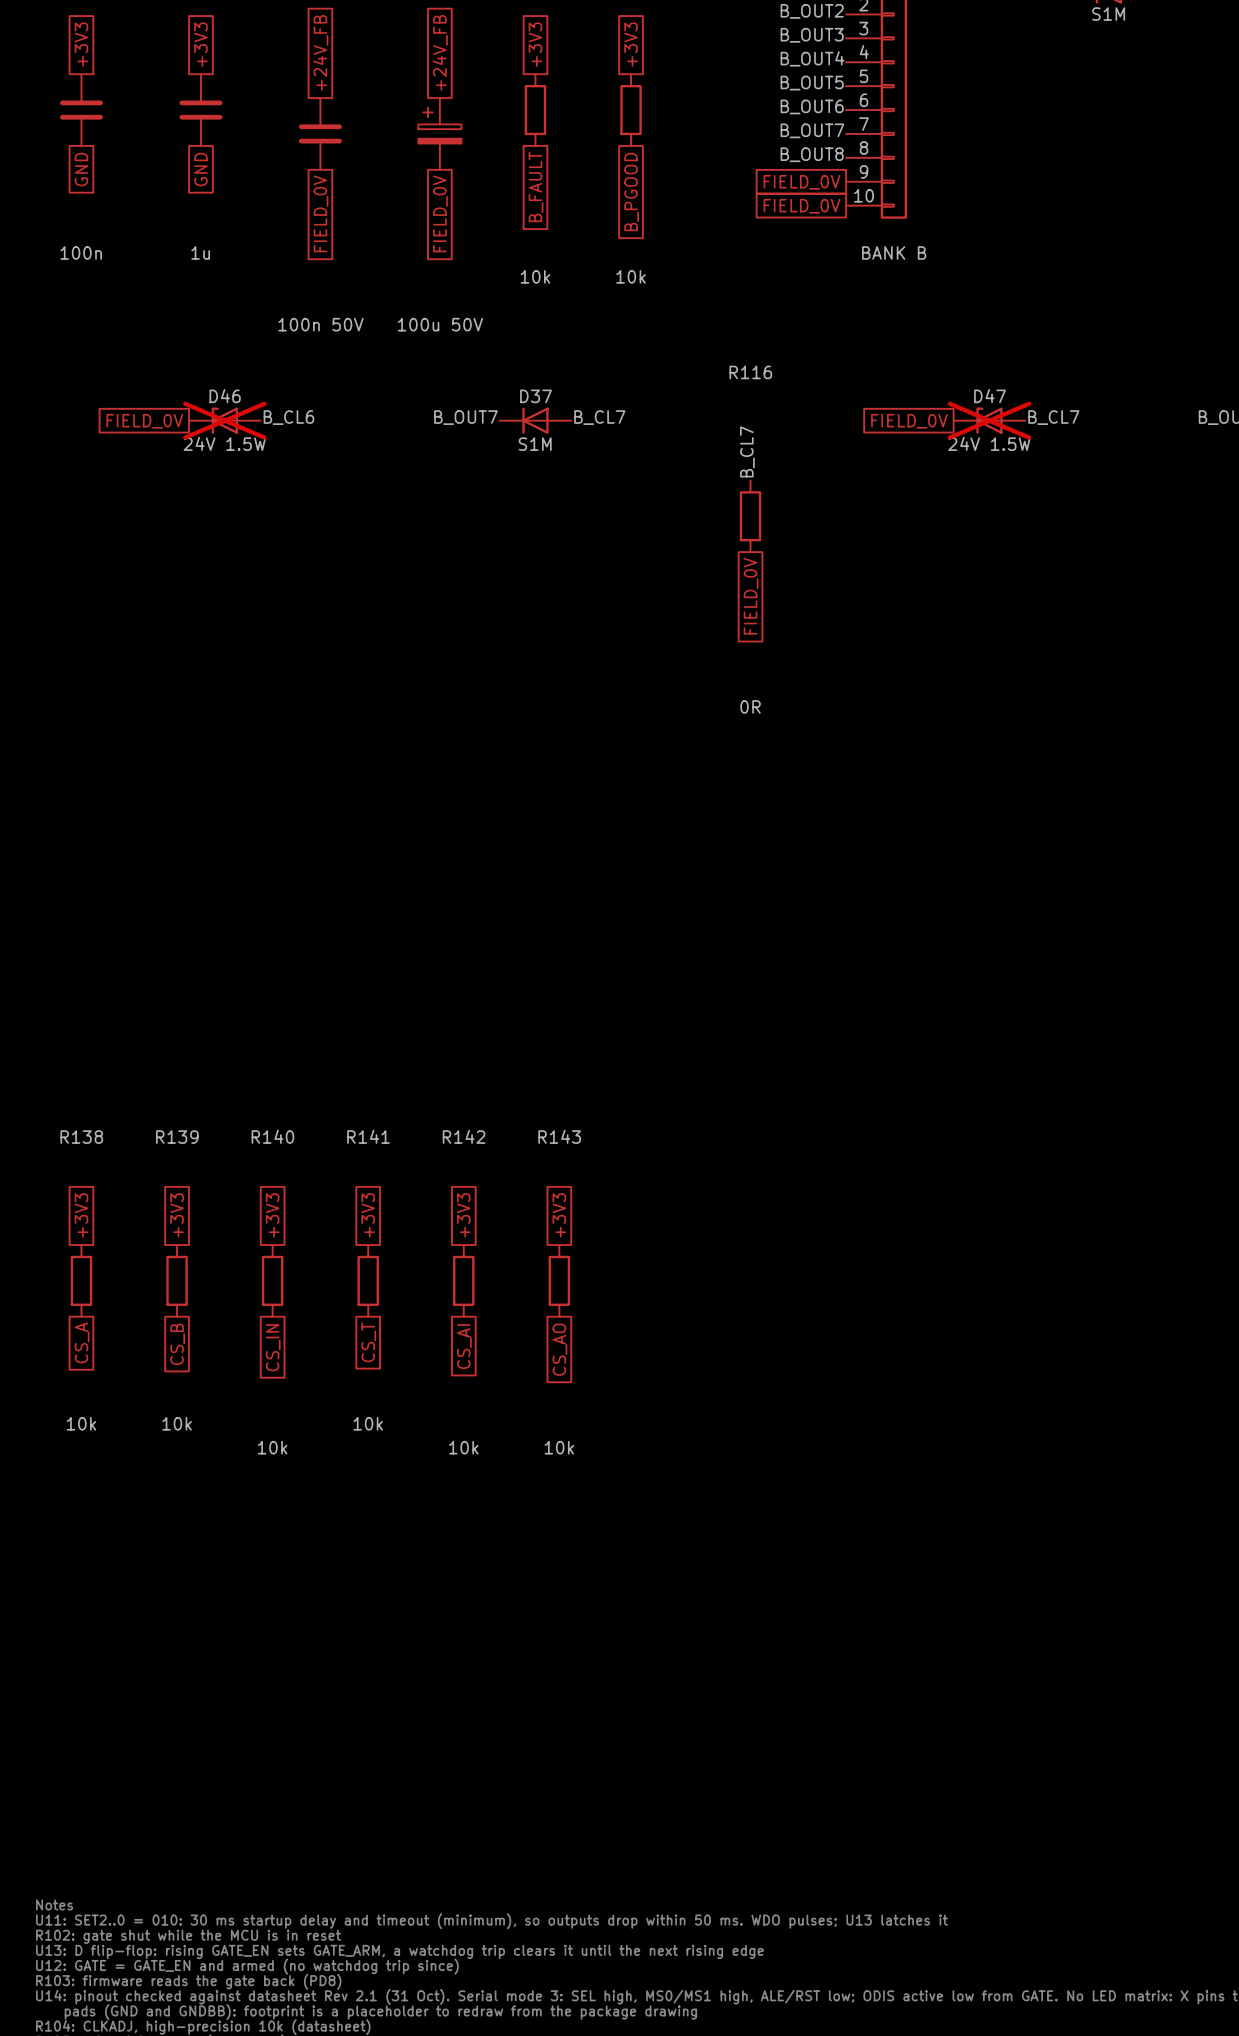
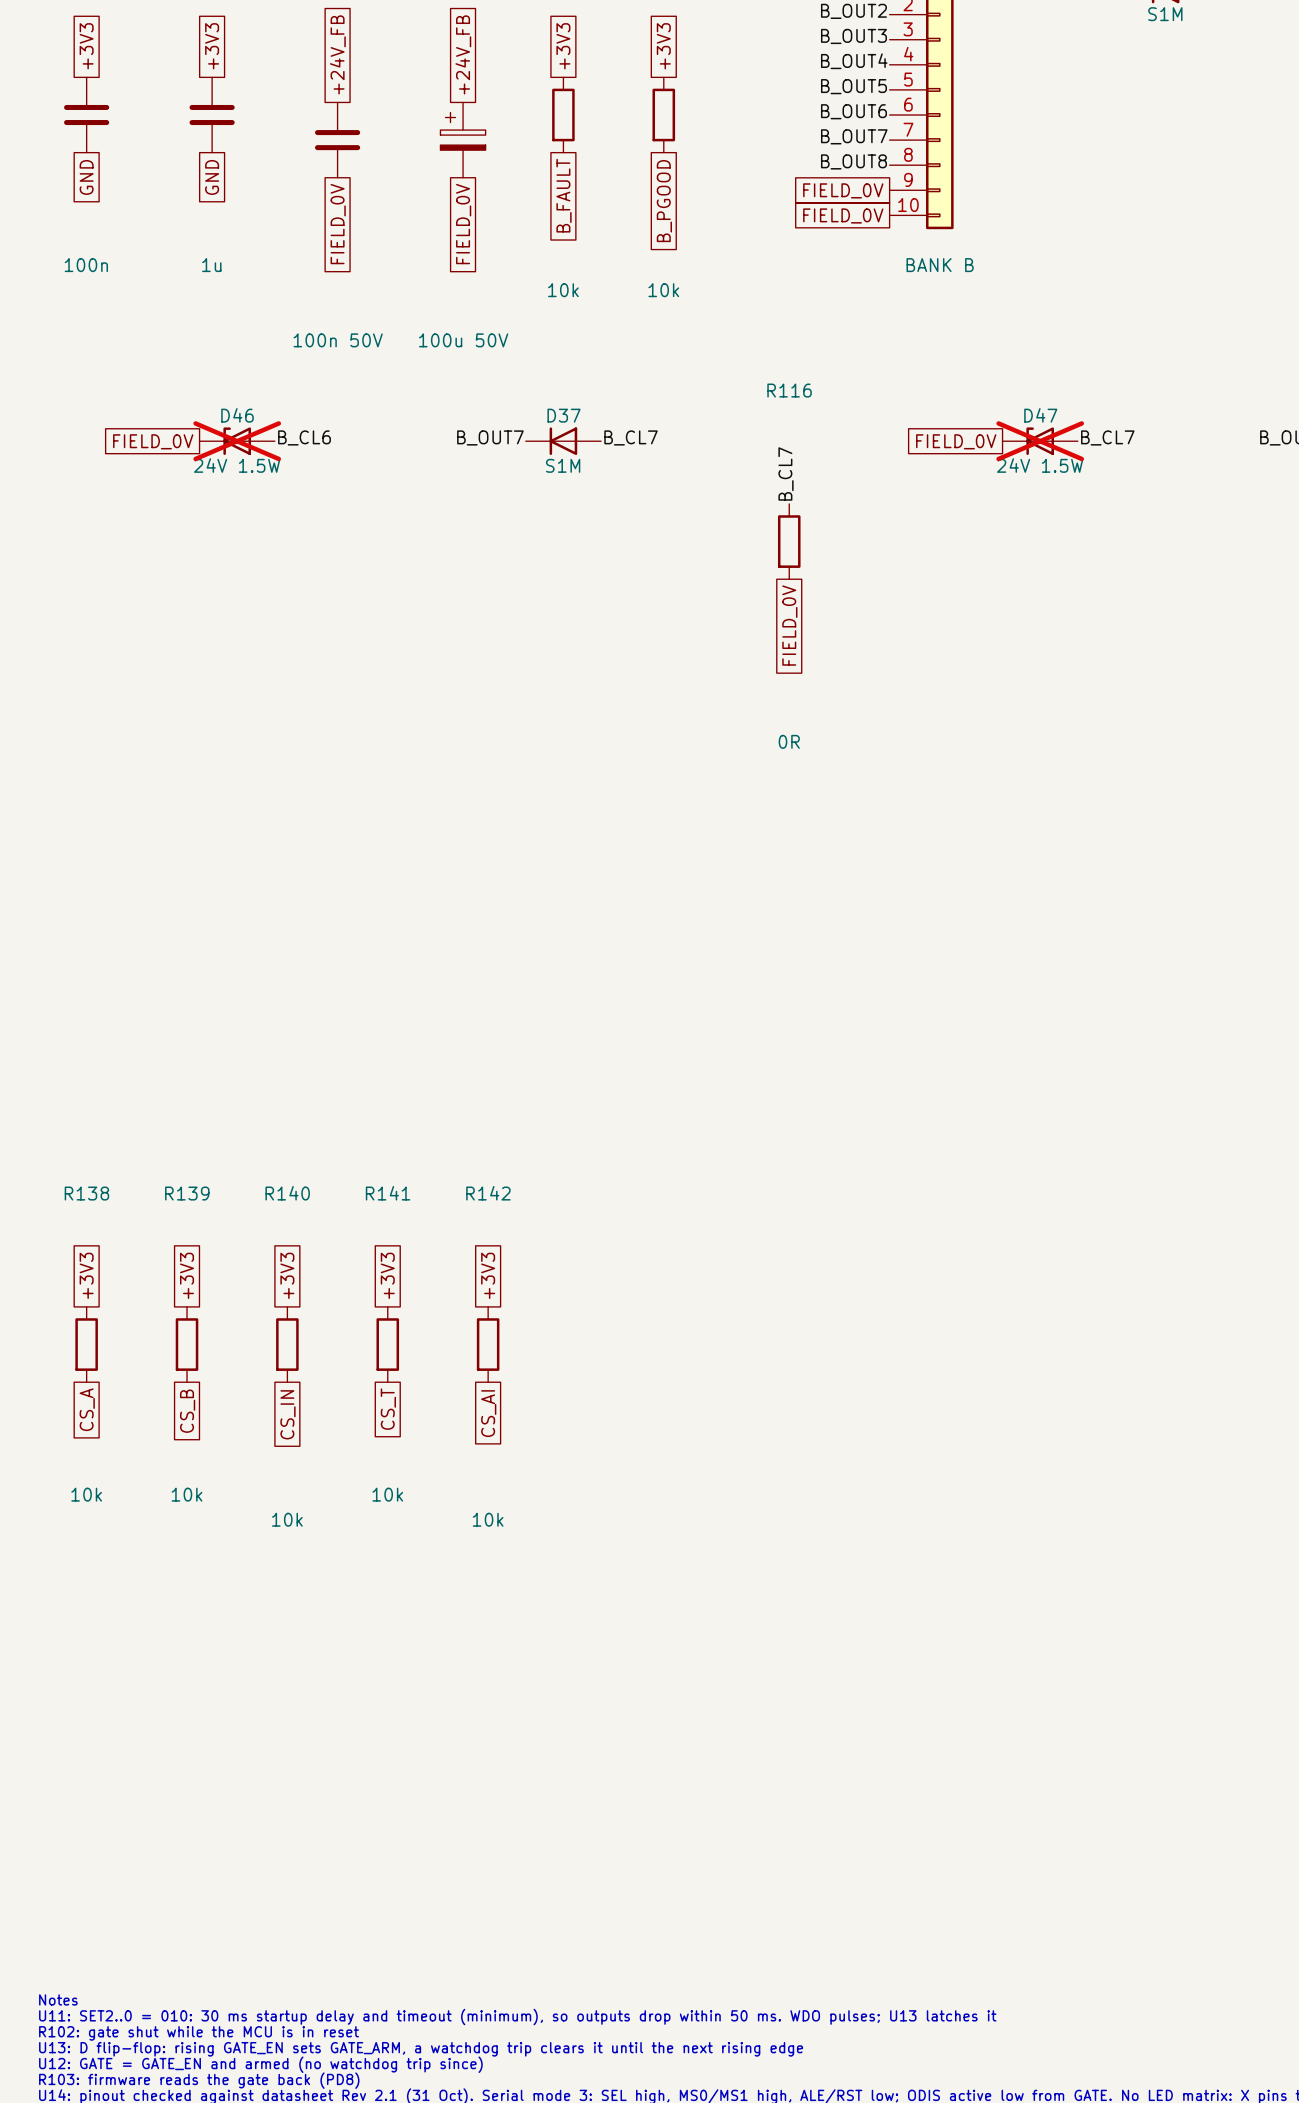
global label: +3V3 (559, 1215) -> none
R143: 10k (559, 1280) -> none
global label: CS_AO (559, 1349) -> none

